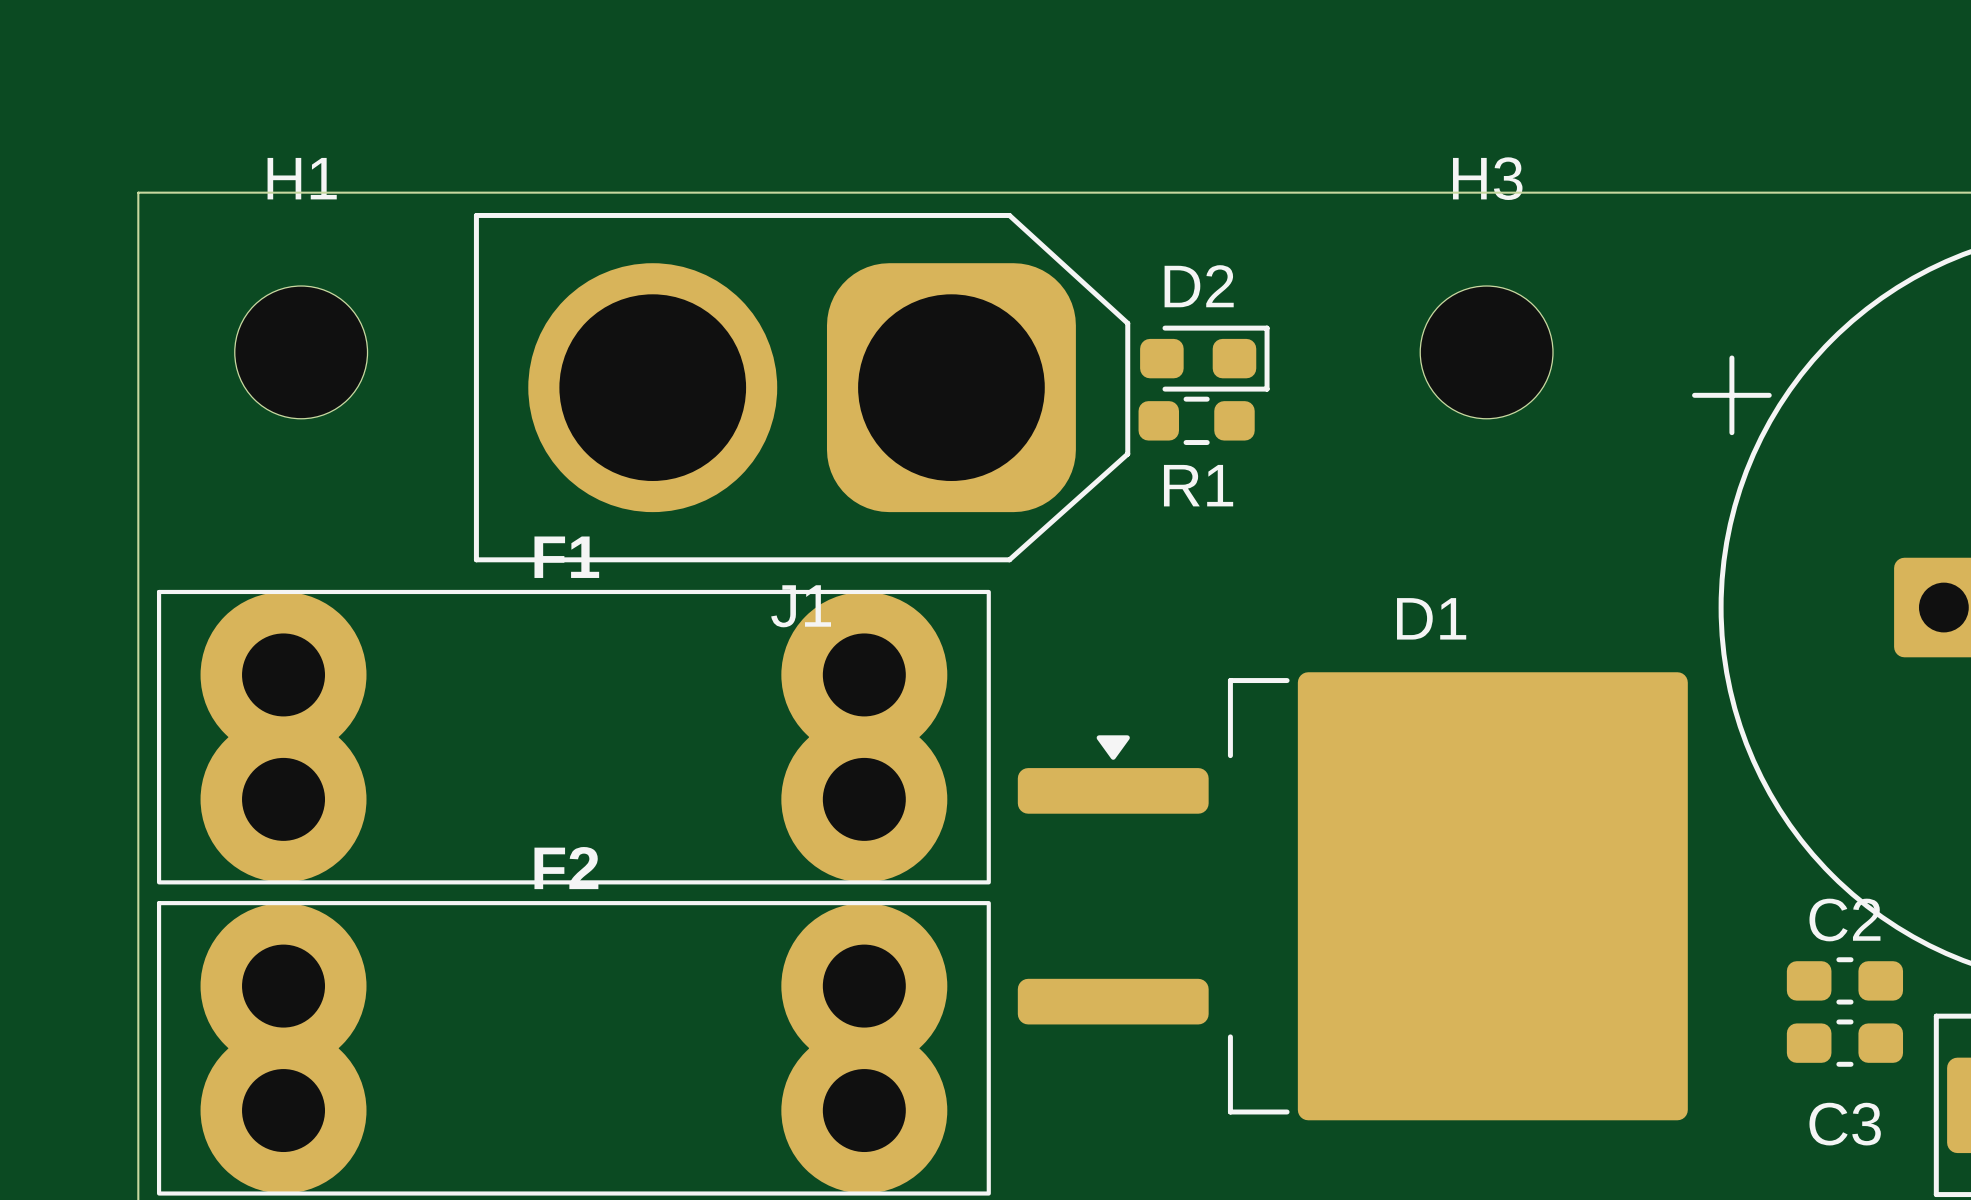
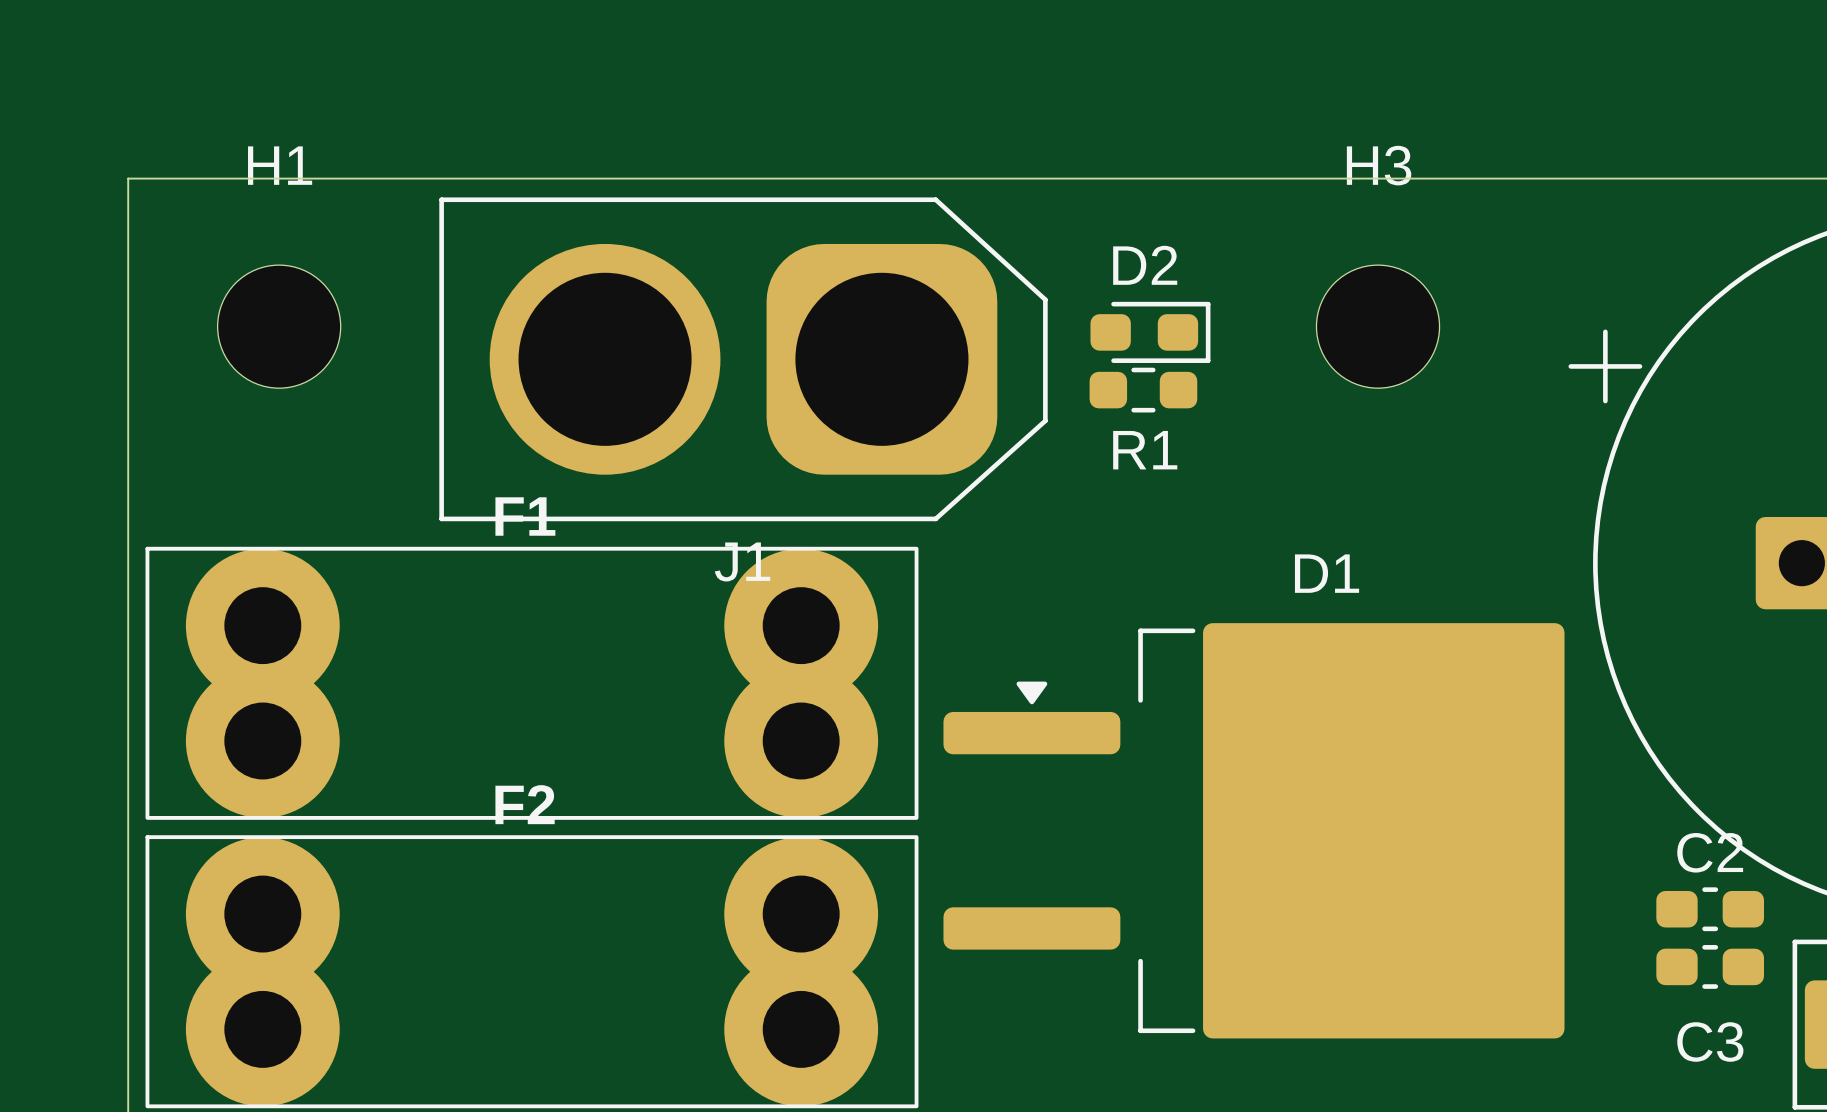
D2 position: (1204, 358) -> (1150, 332)
R1 position: (1196, 420) -> (1143, 390)

